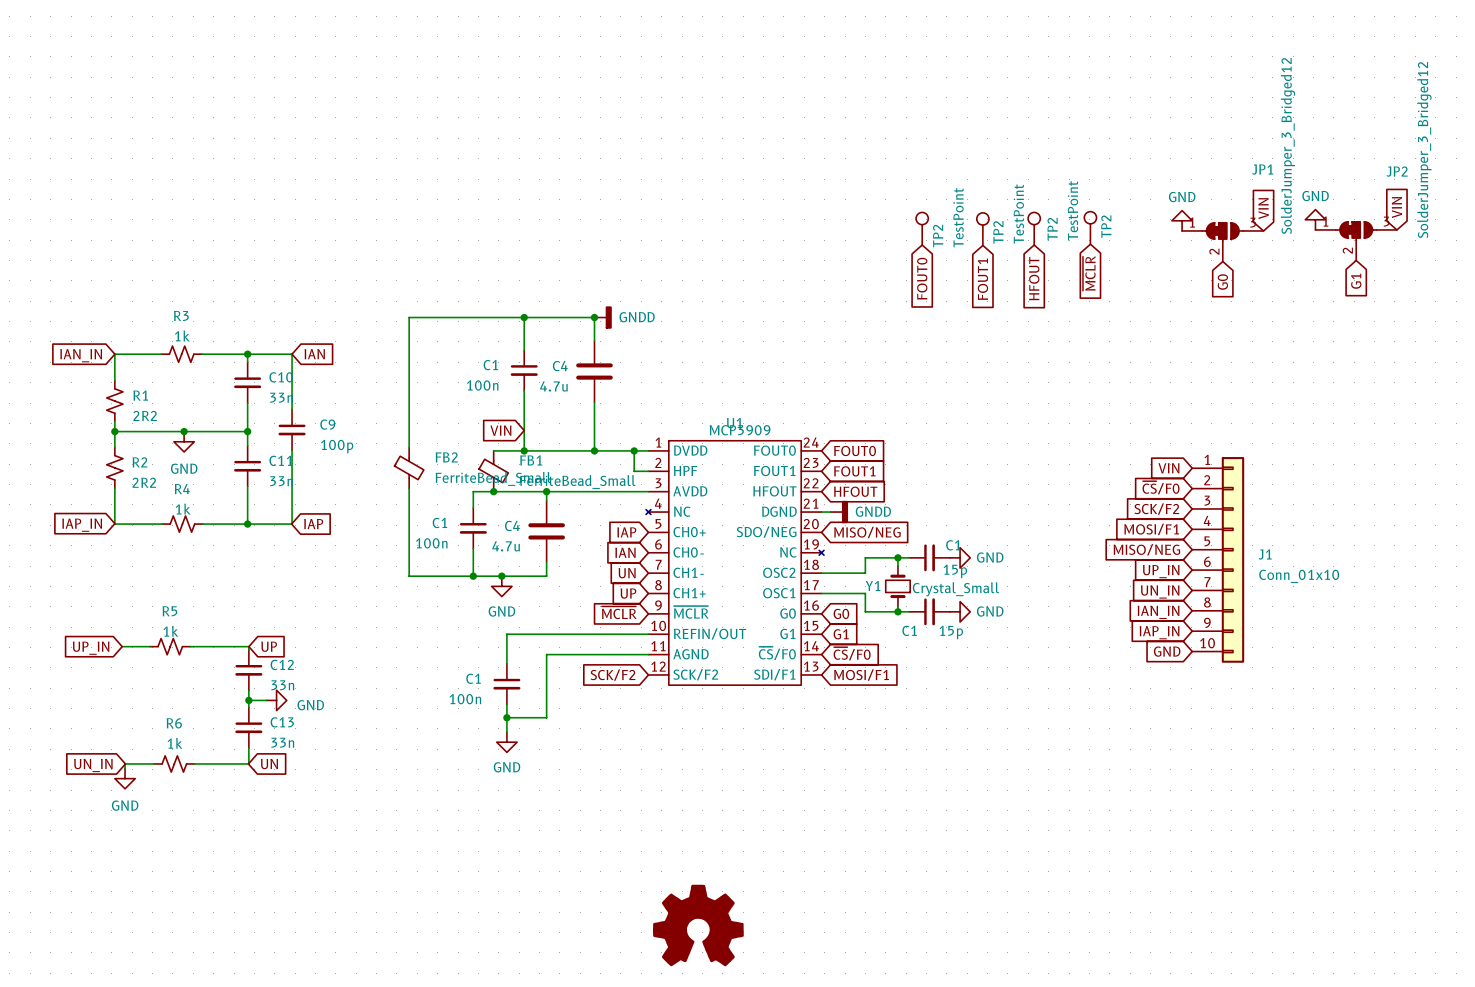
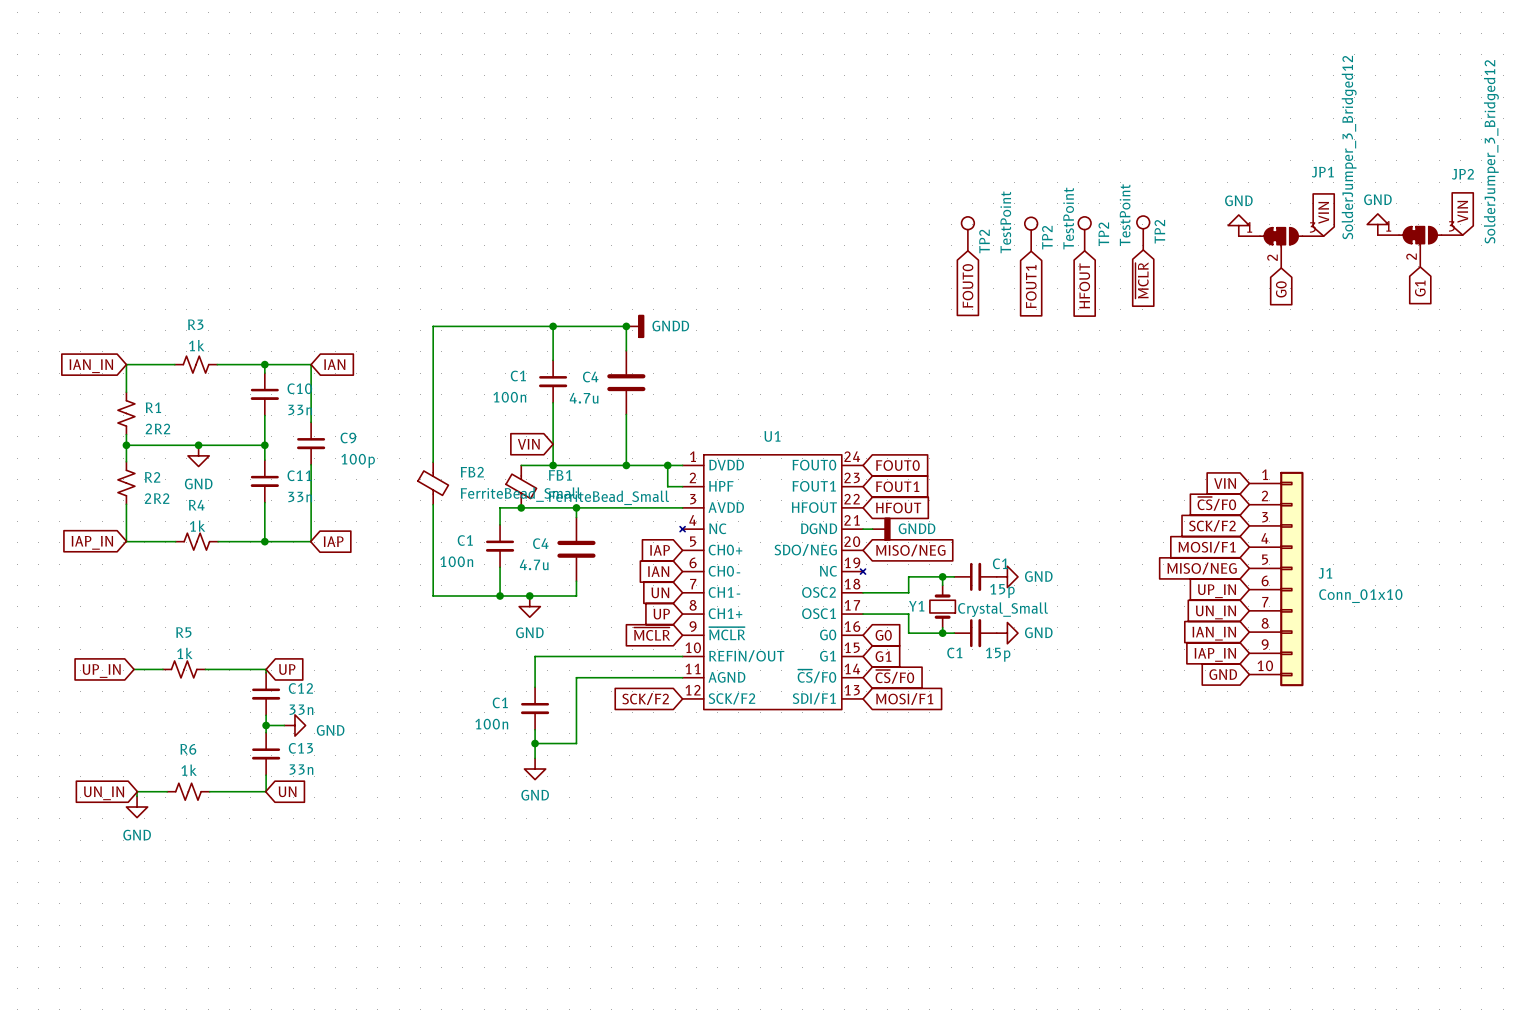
U1 value: MCP3909 (740, 430) -> none
part: (698, 925) -> none

